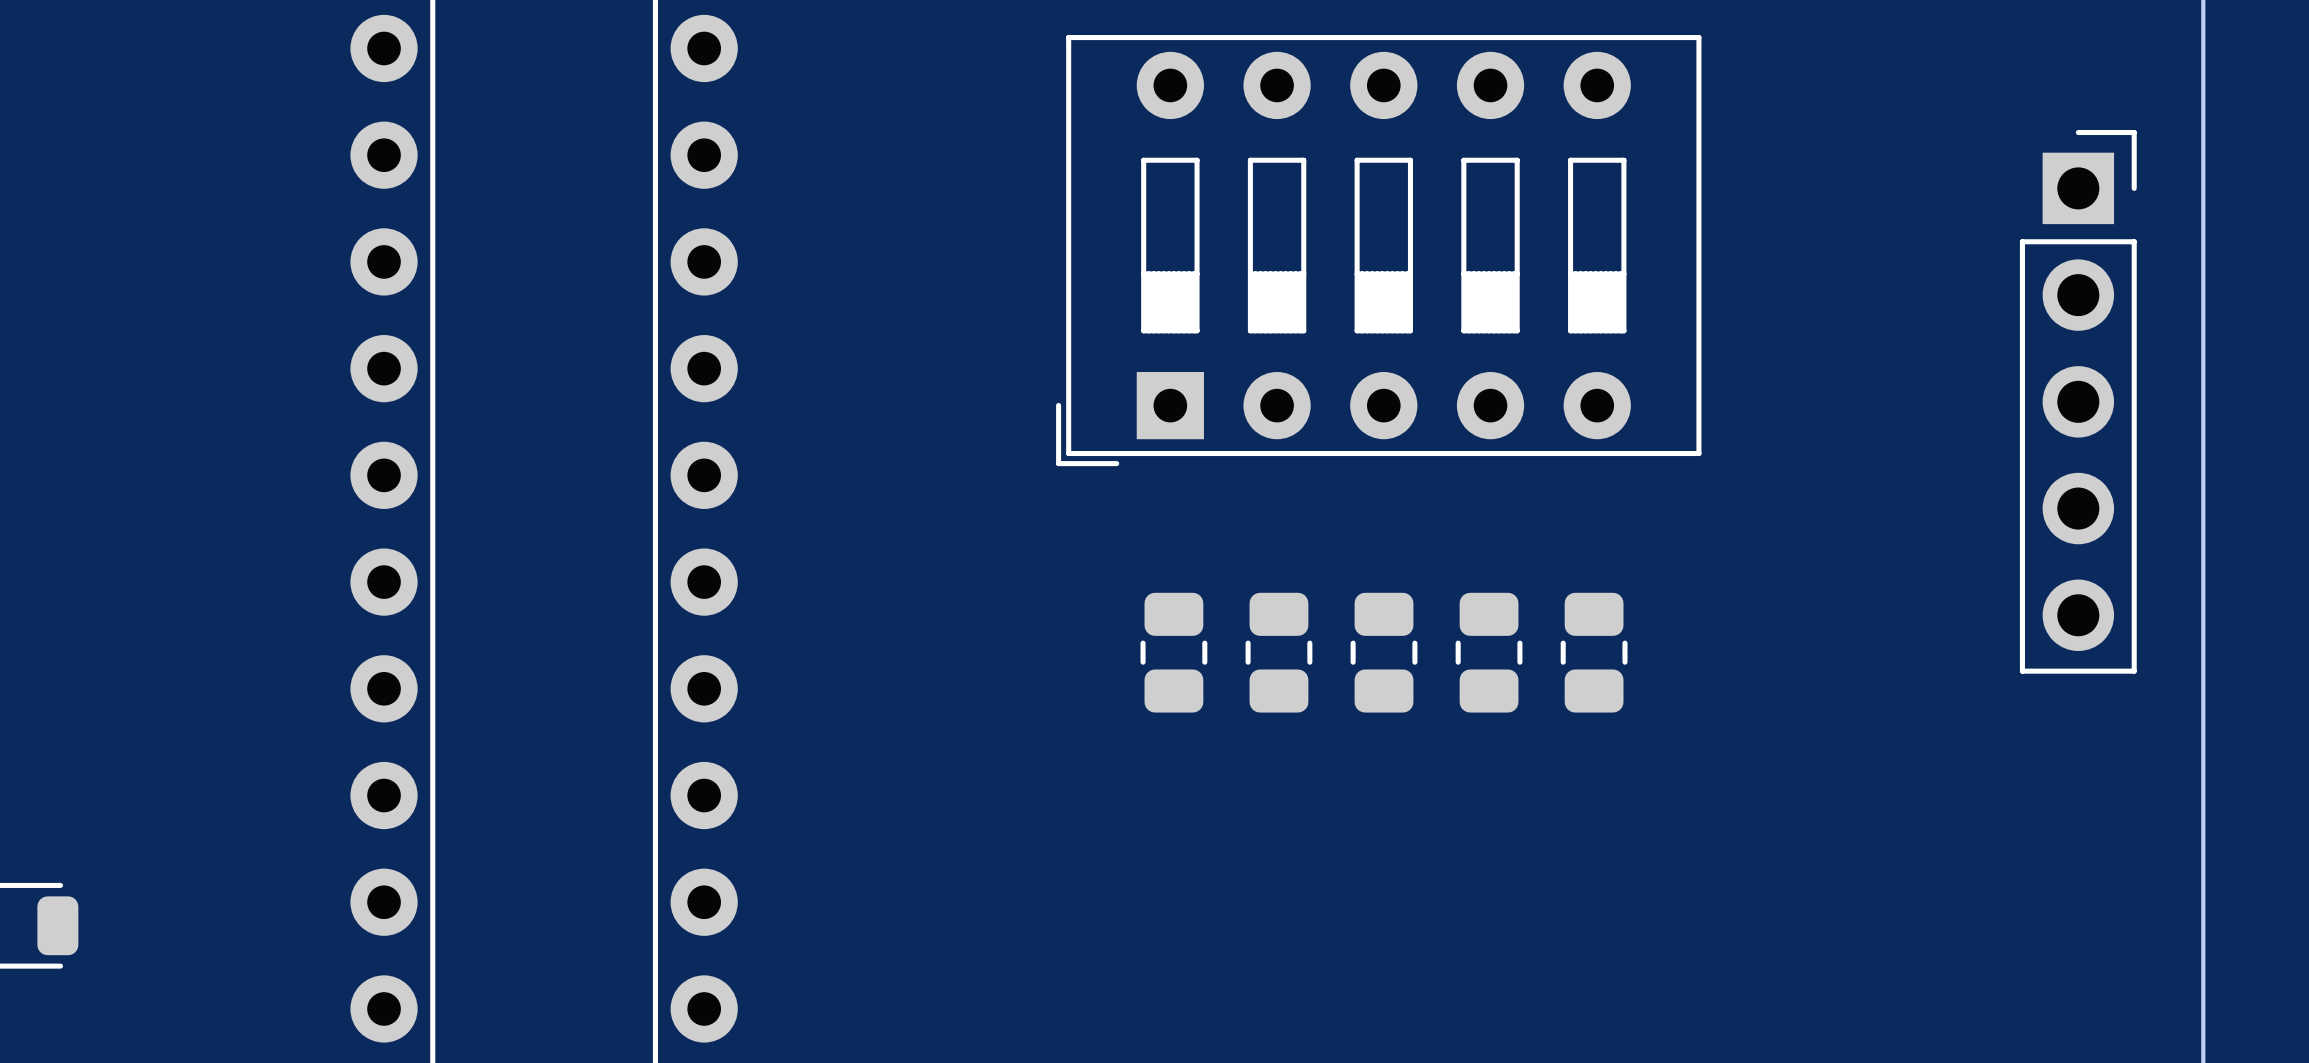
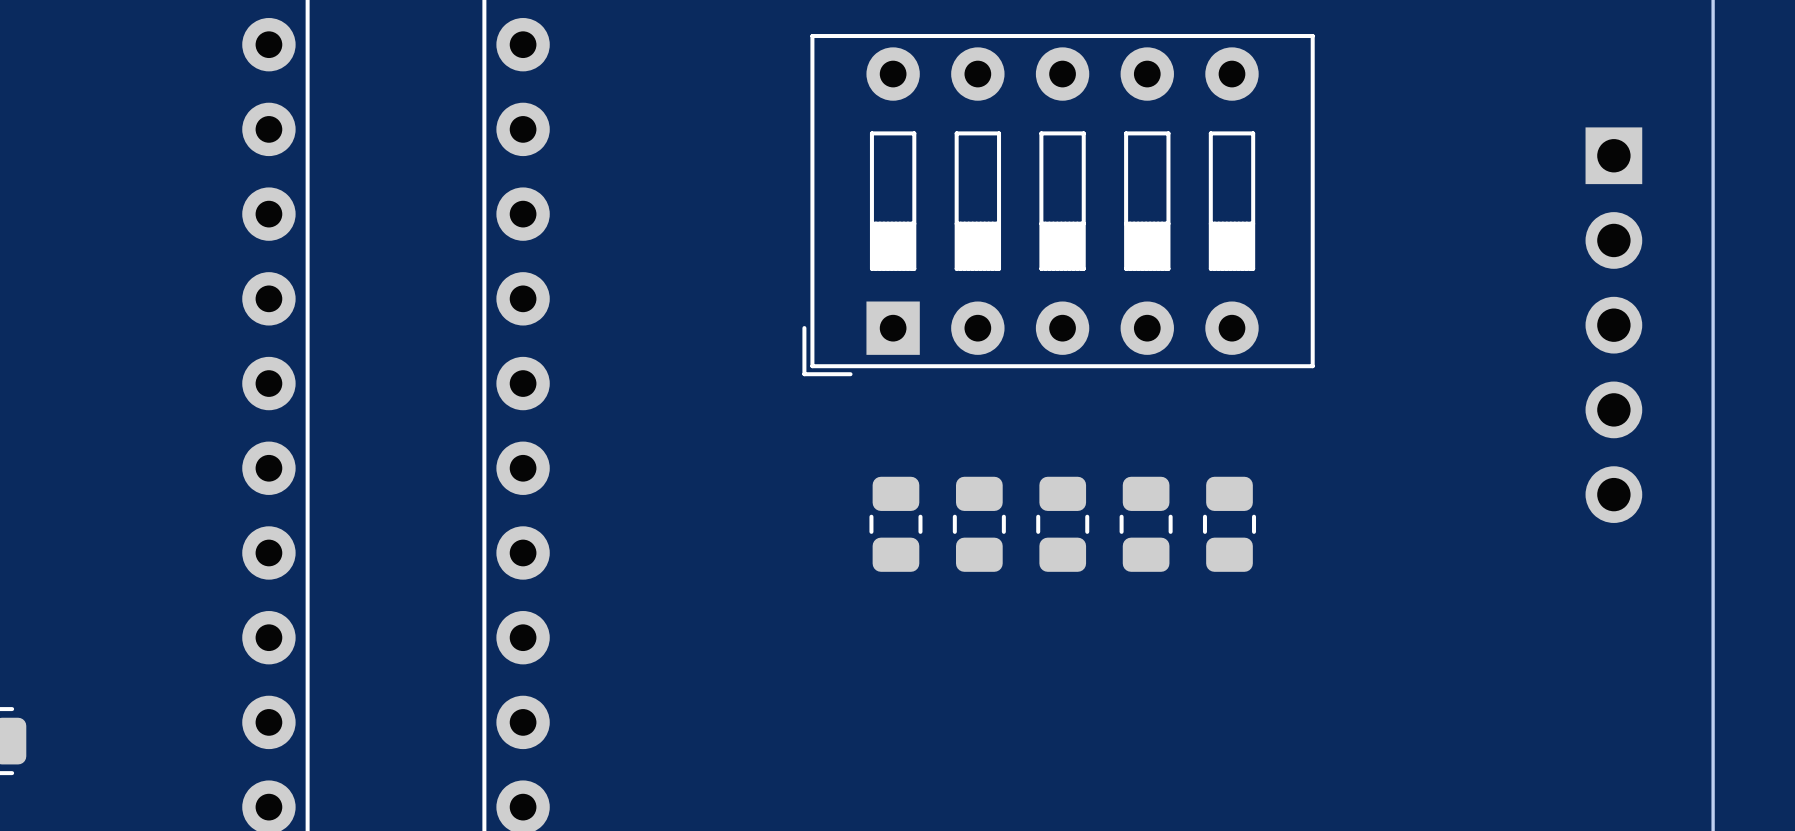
part side: top (2078, 401) -> bottom (1613, 325)

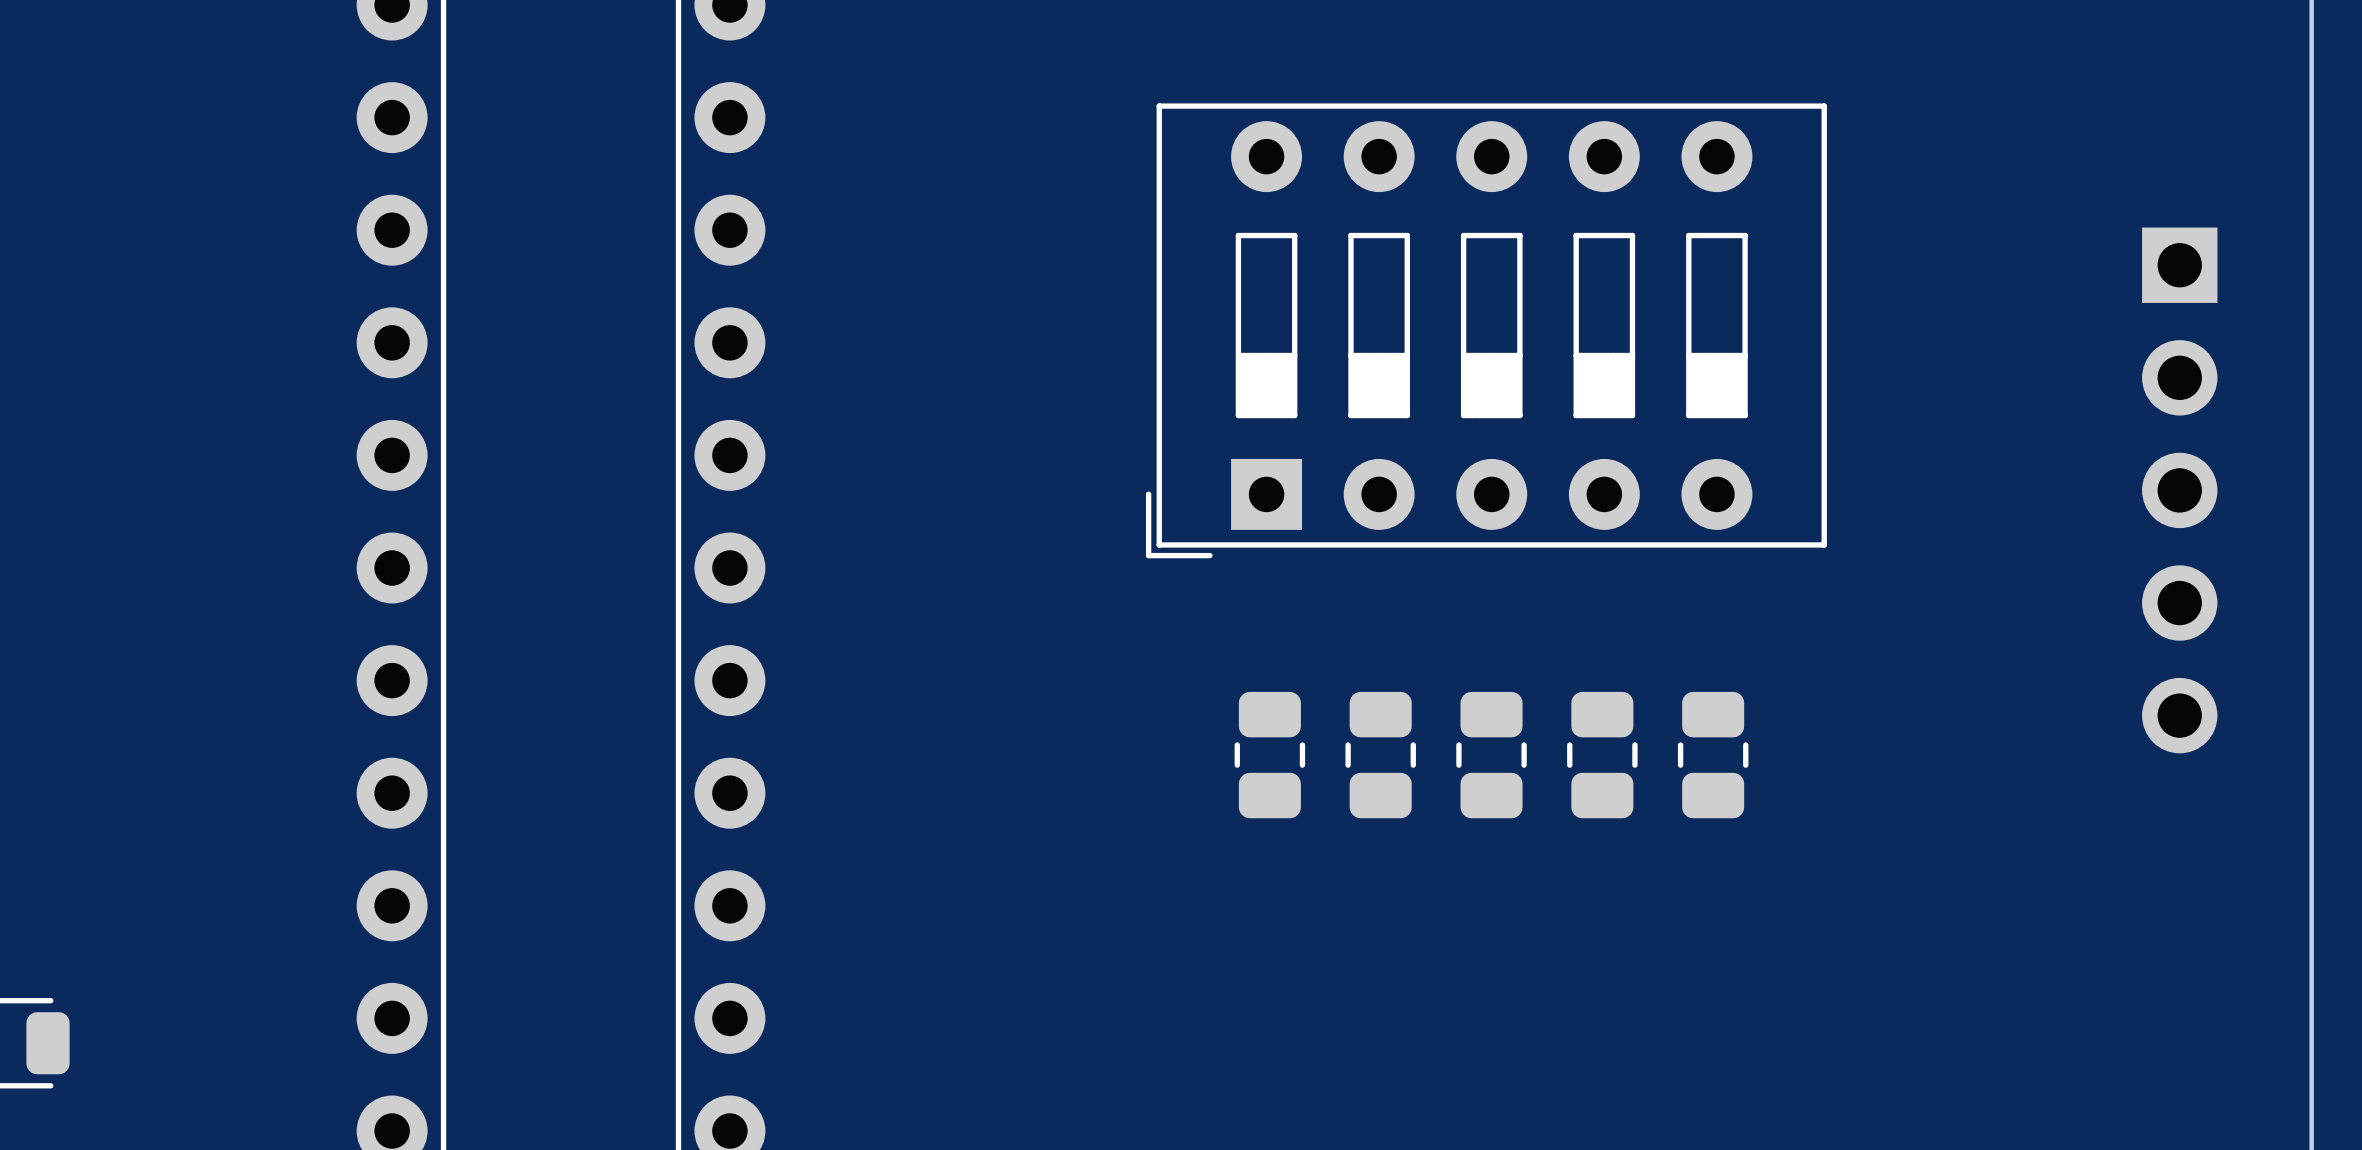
part position: (1058, 205) -> (1486, 330)
part: (895, 524) -> none
part: none -> (1269, 755)
part: (979, 524) -> none
part: none -> (1380, 755)
part: (1062, 524) -> none
part: none -> (1491, 755)
part: (1146, 524) -> none
part: none -> (1602, 755)
part: (1229, 524) -> none
part: none -> (1713, 755)

